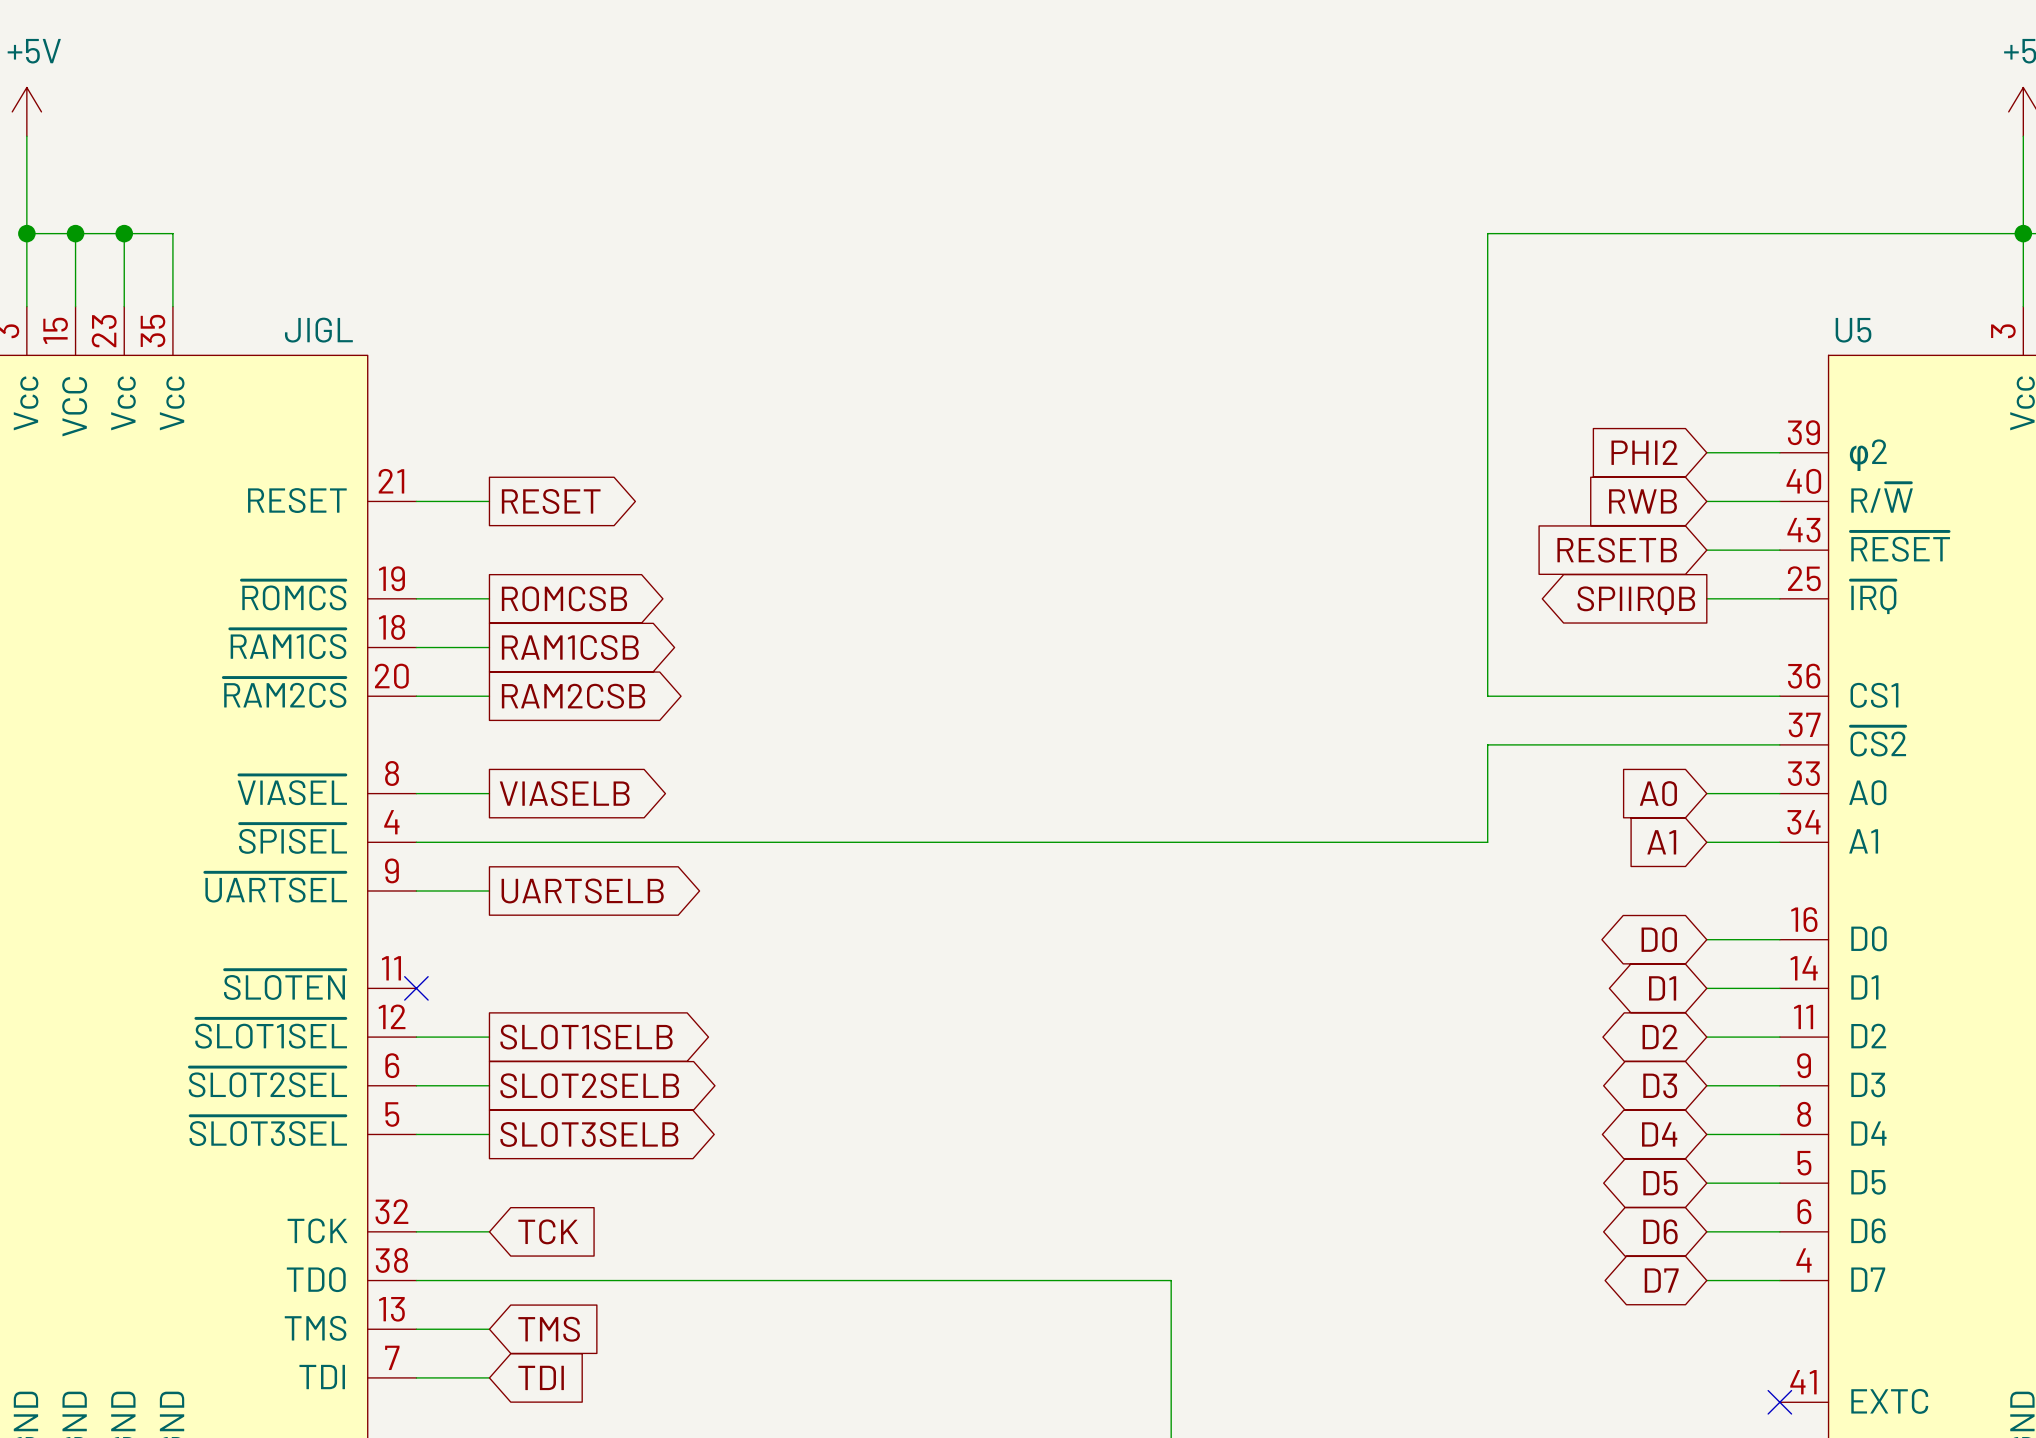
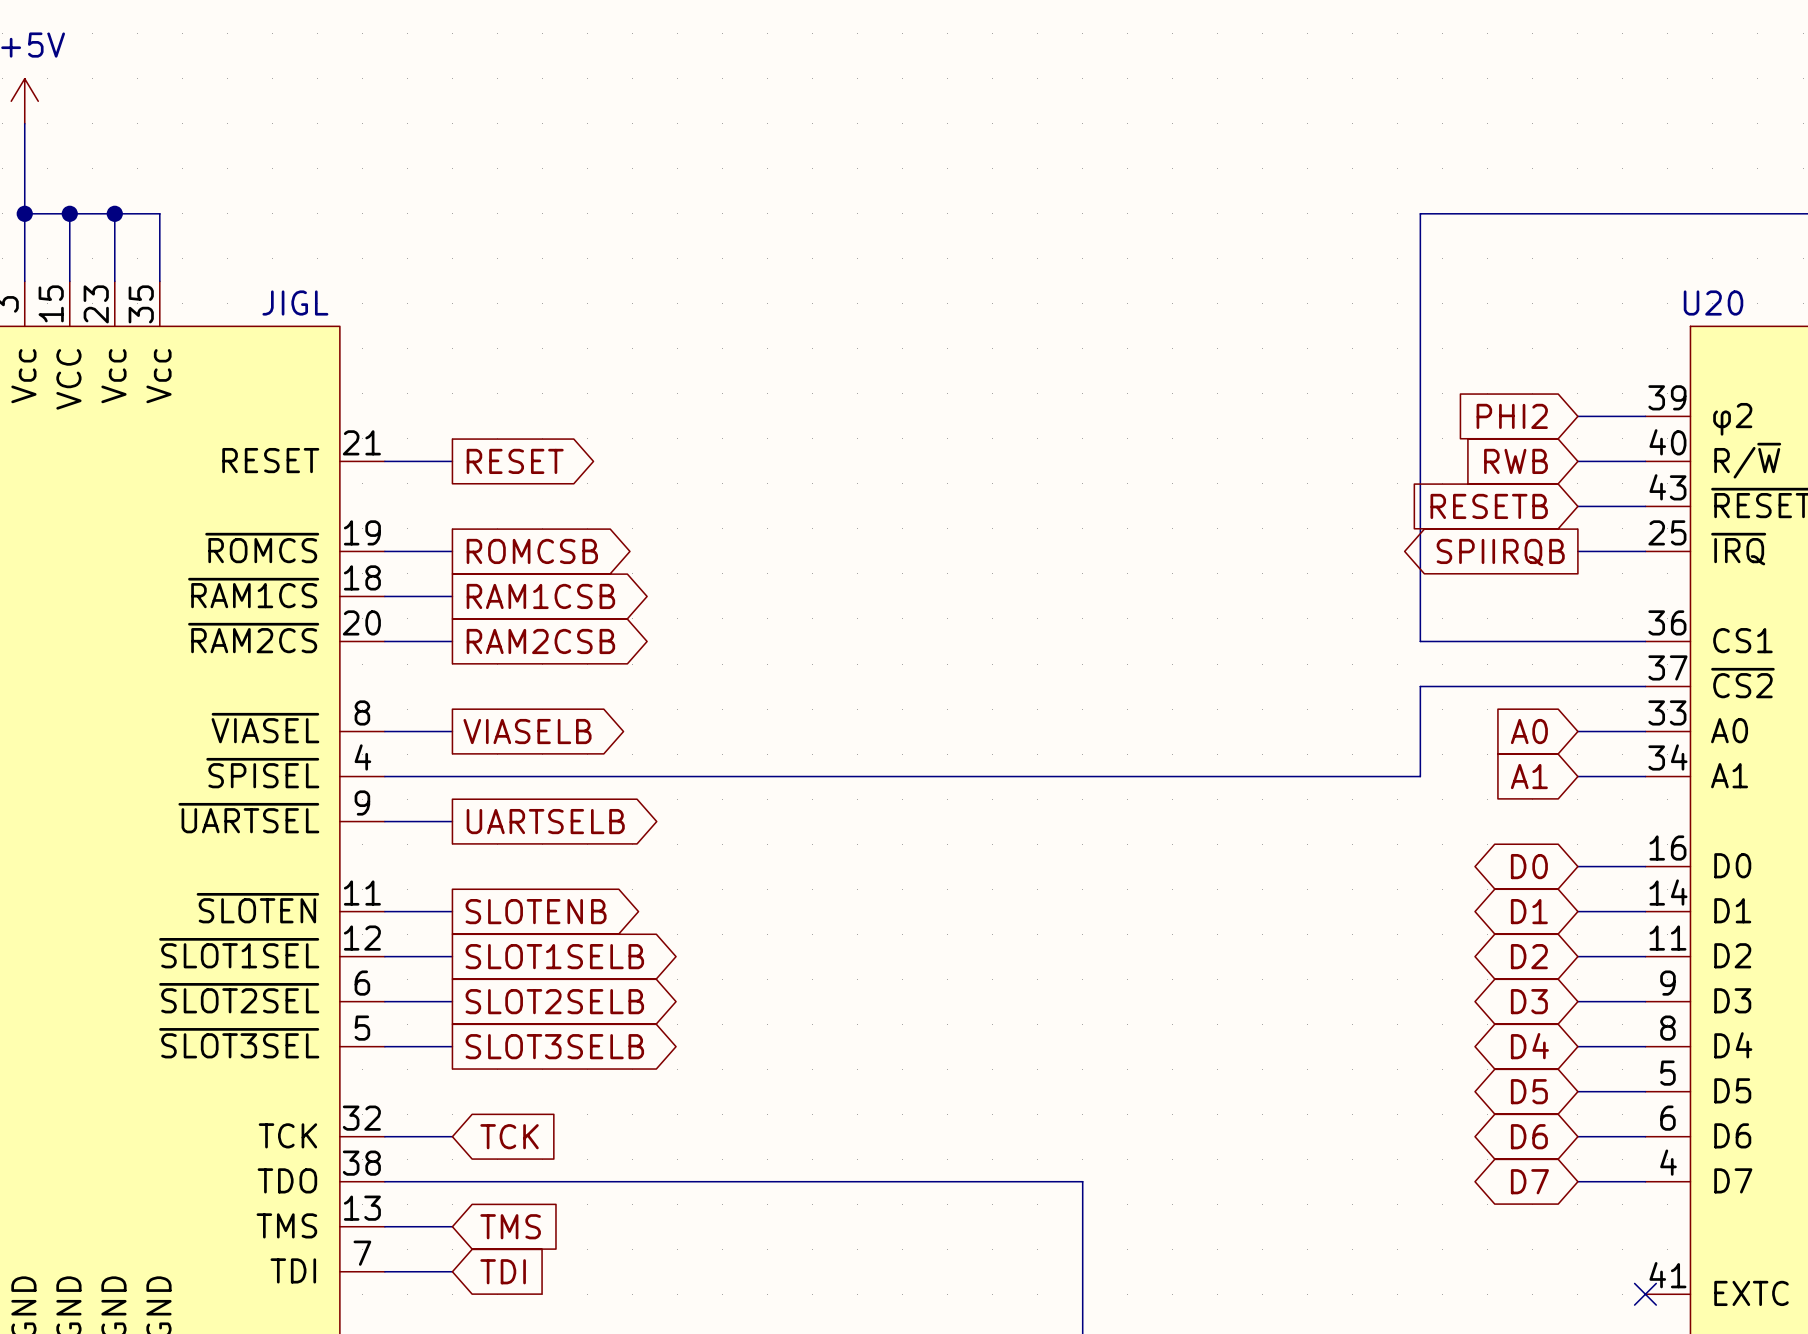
wire: (1536, 233) (1487, 233) (1487, 696) (1536, 696) -> (1420, 213) (1420, 641)
U5 name: U5 (1853, 330) -> U20 (1713, 303)
wire: (1536, 744) (1487, 744) (1487, 842) -> (1420, 686) (1420, 776) (1375, 776)
wire: none -> (384, 911) (452, 911)
no-connect mark: (416, 988) -> none
global label: none -> SLOTENB (536, 911)

